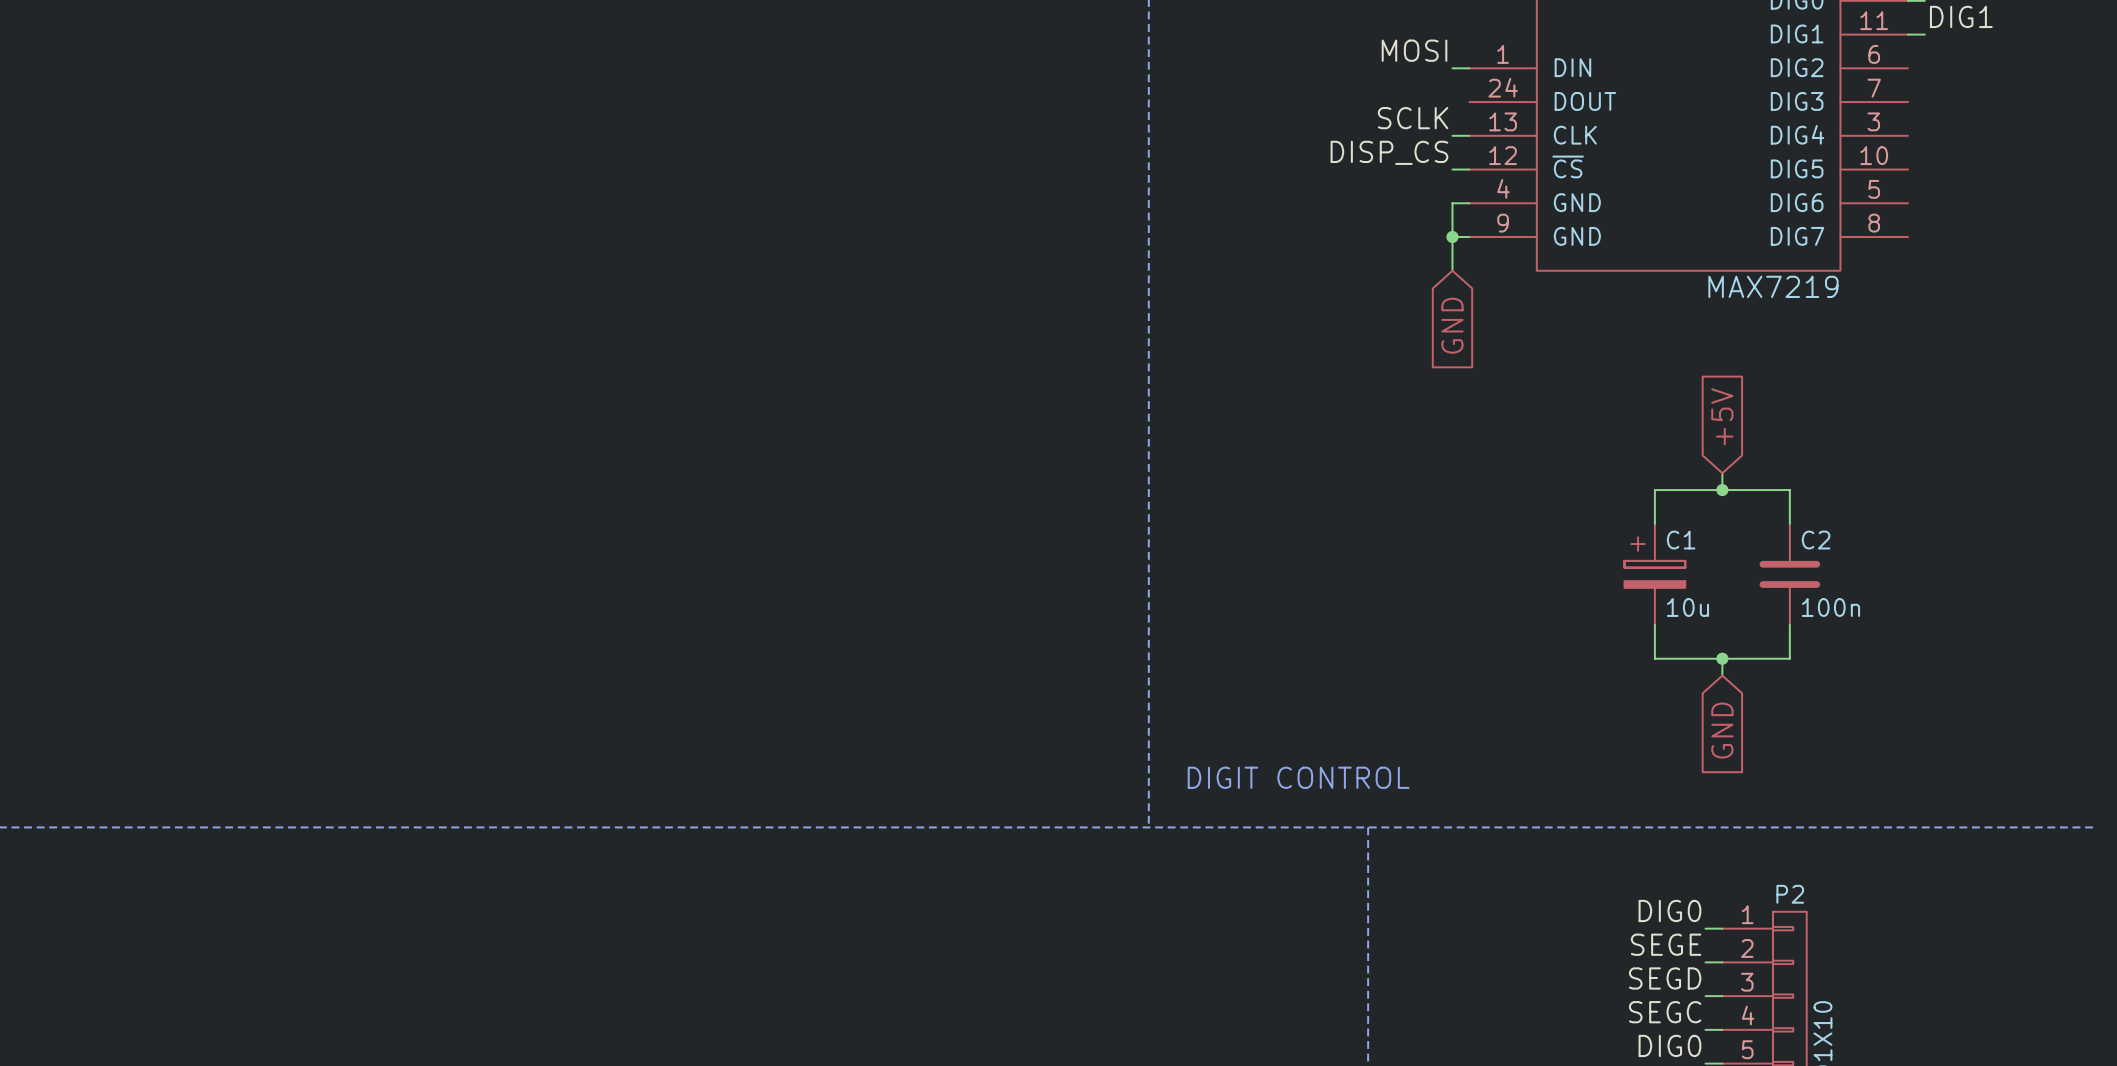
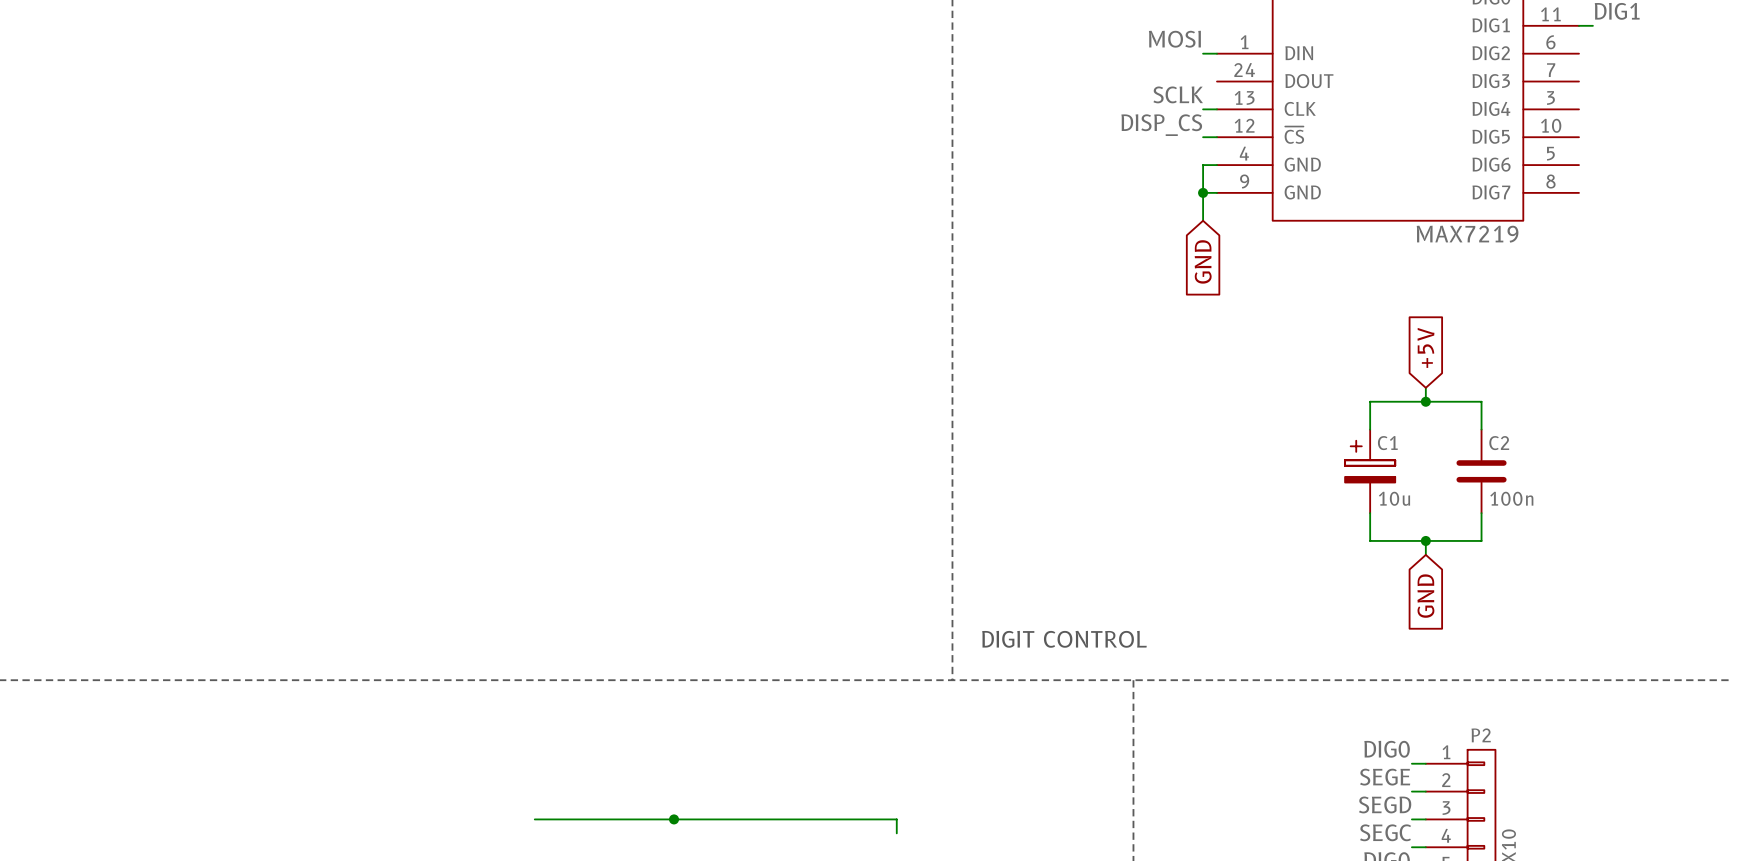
wire: none -> (534, 819) (896, 819) (896, 833)
junction: none -> (674, 819)

